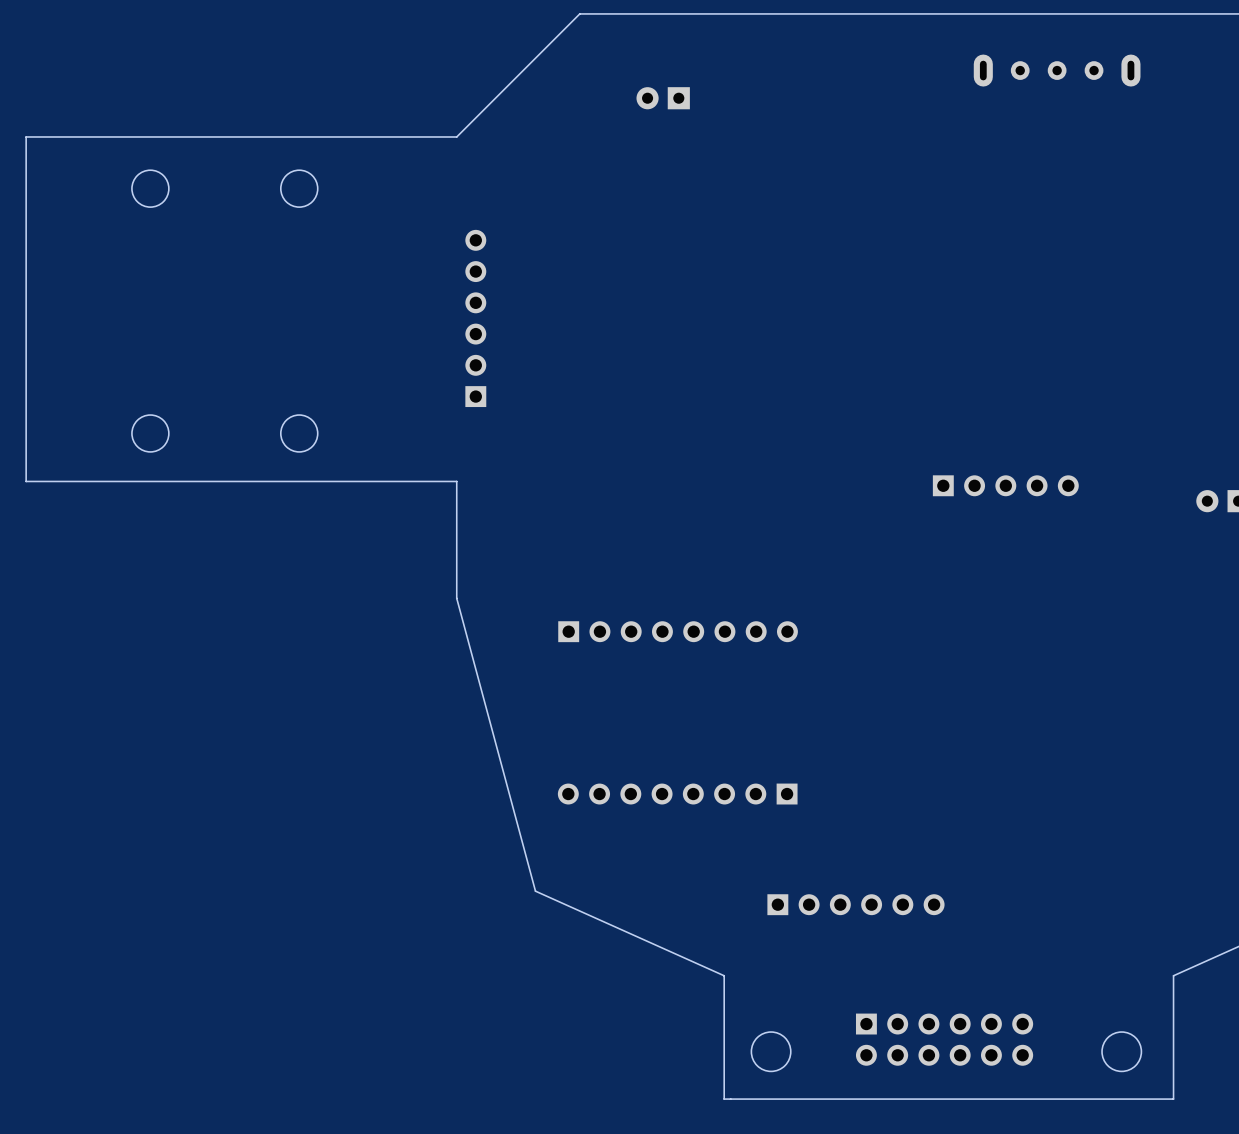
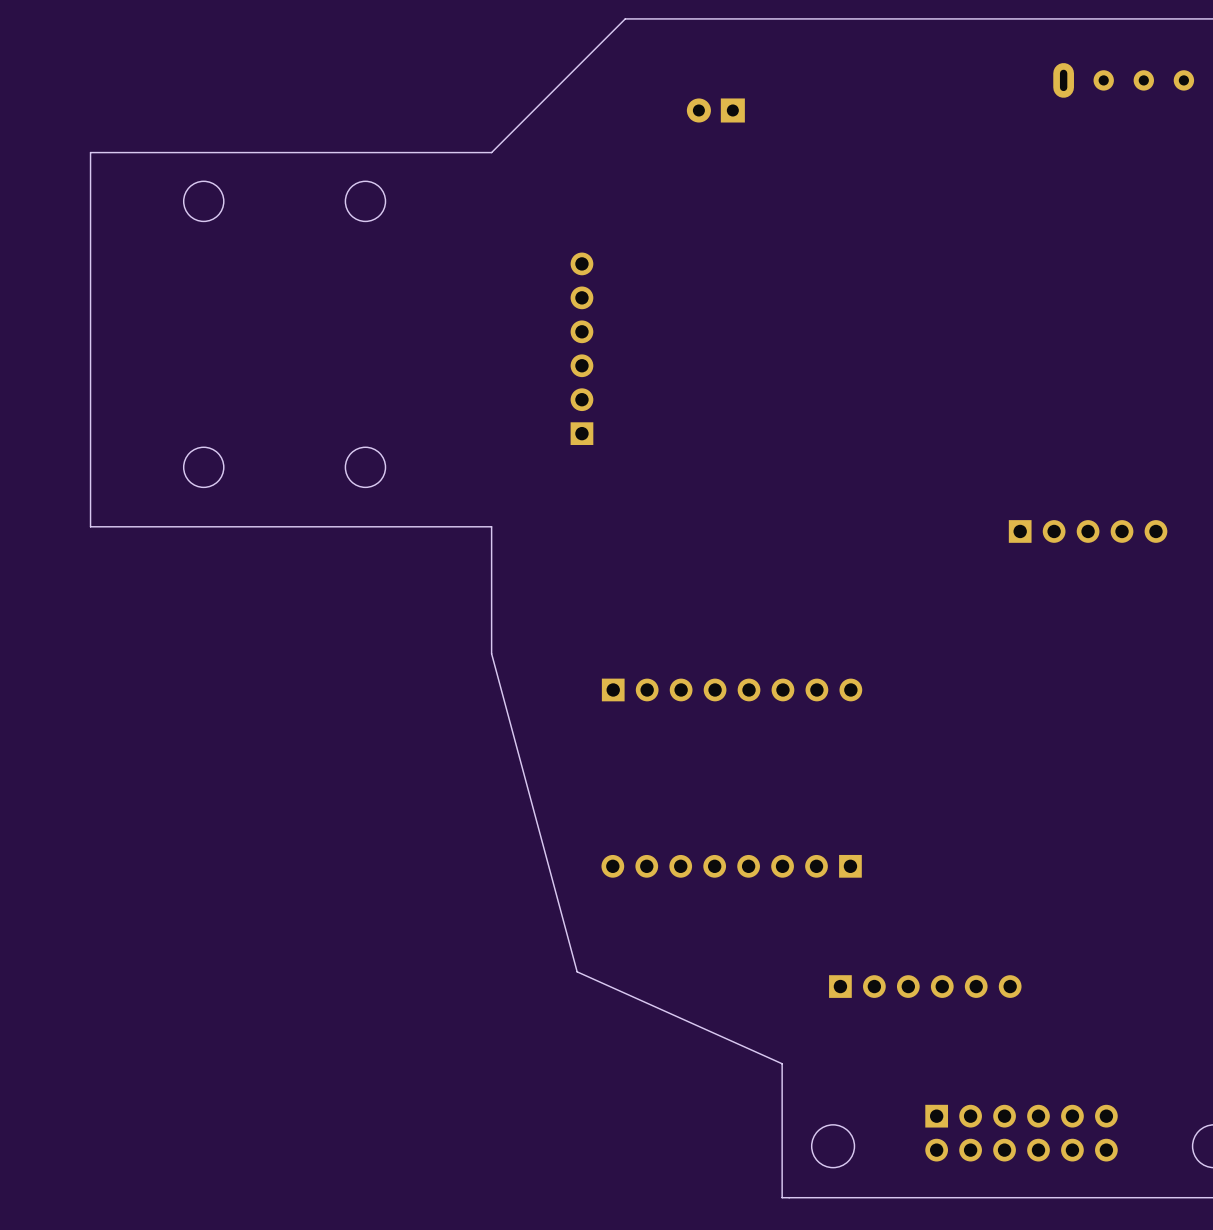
board edge: (87, 136) (26, 136) (26, 481) (87, 481) -> (90, 152) (90, 526)
round board edge position: (150, 188) -> (203, 201)
round board edge position: (299, 188) -> (365, 201)
part position: (475, 318) -> (581, 348)
round board edge position: (150, 433) -> (203, 467)
round board edge position: (299, 433) -> (365, 467)

